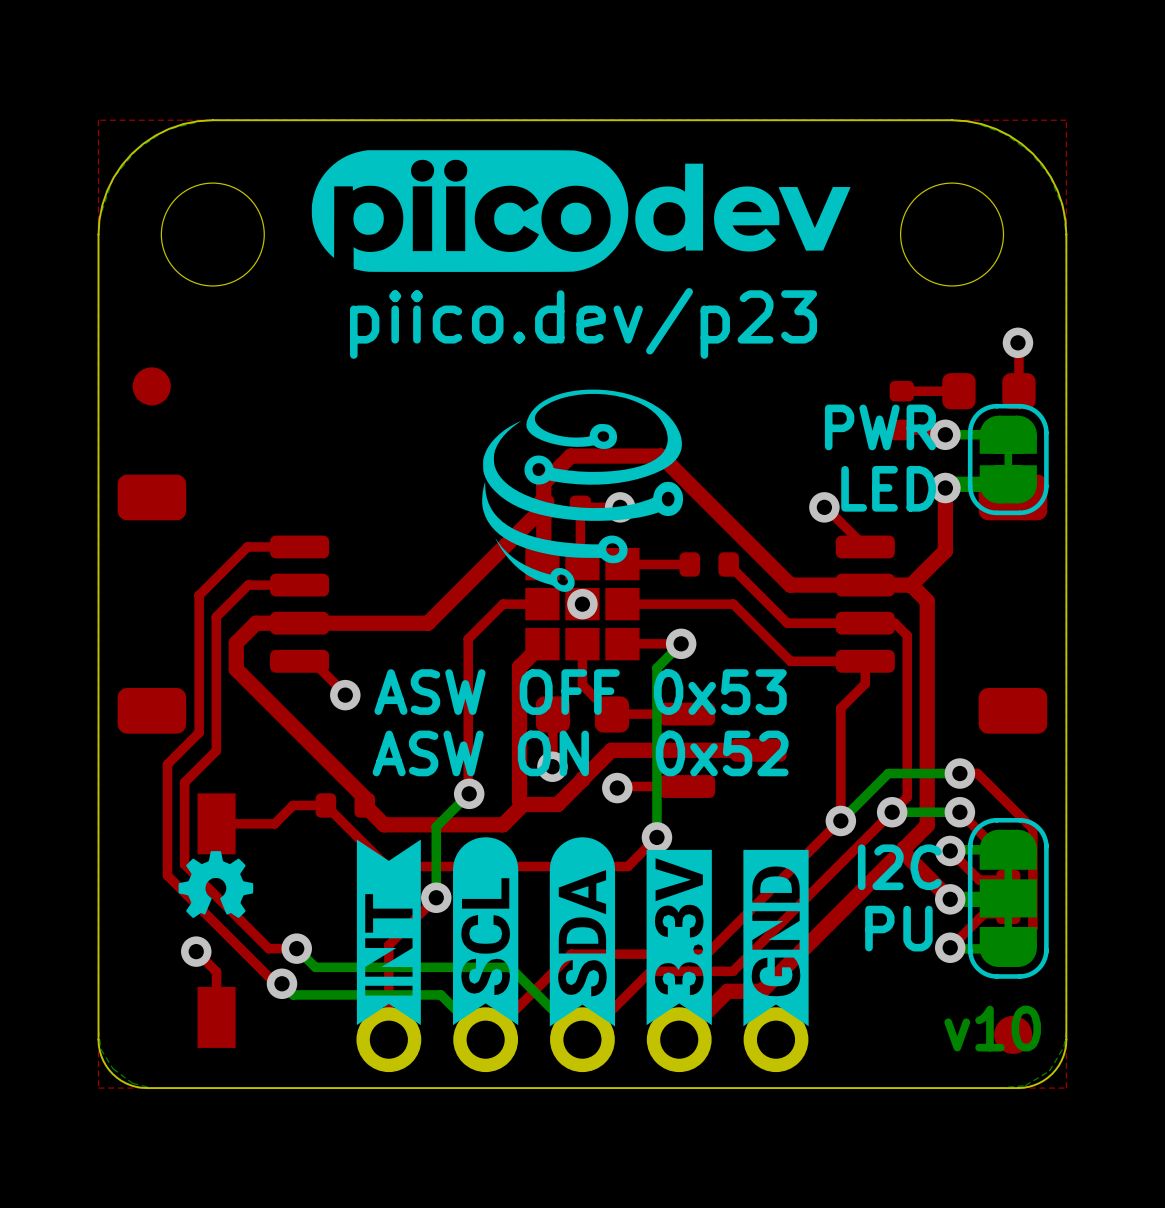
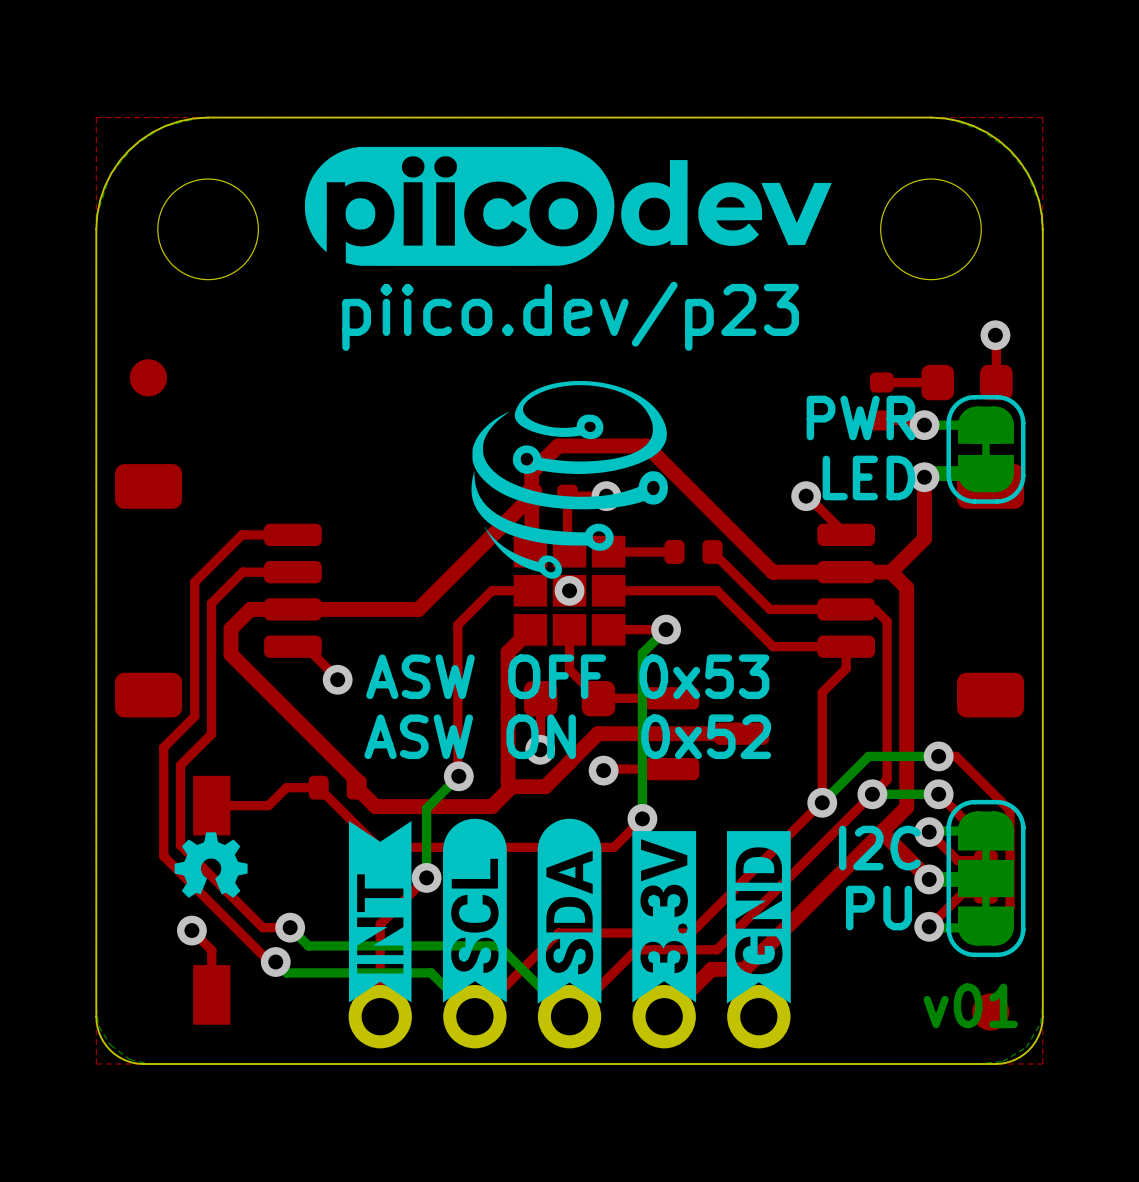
text: v10 (992, 1028) -> v01 (970, 1005)

